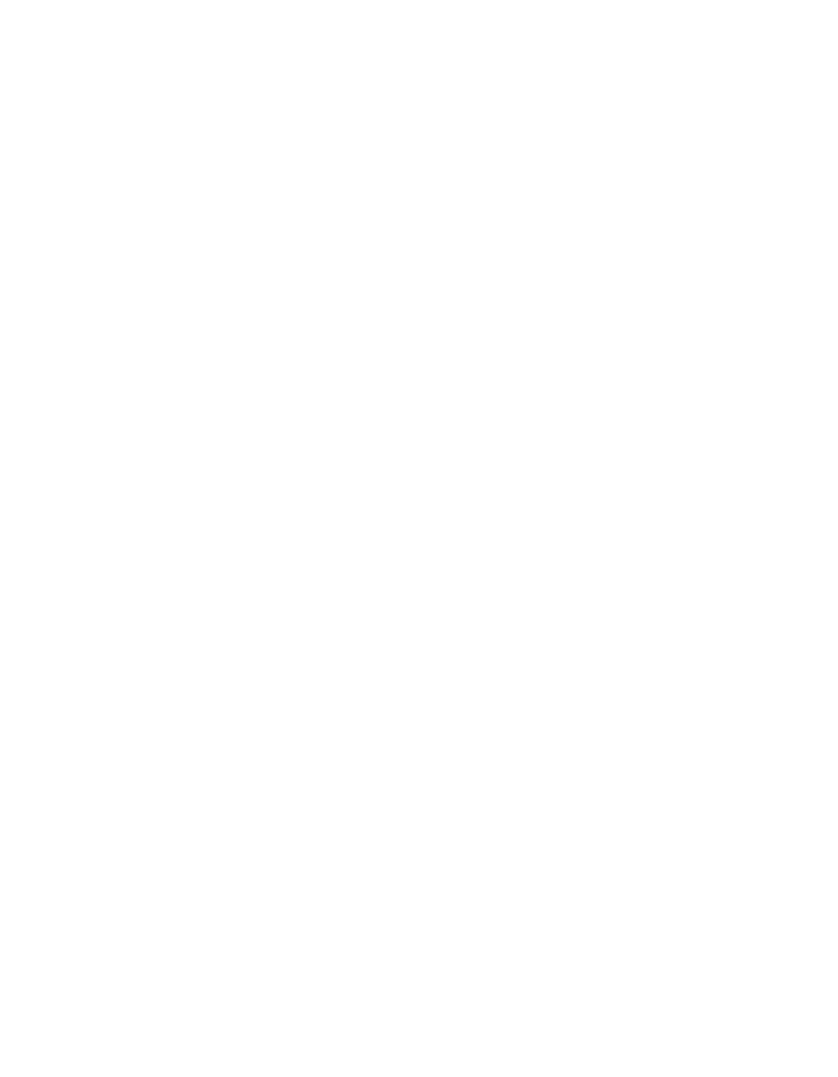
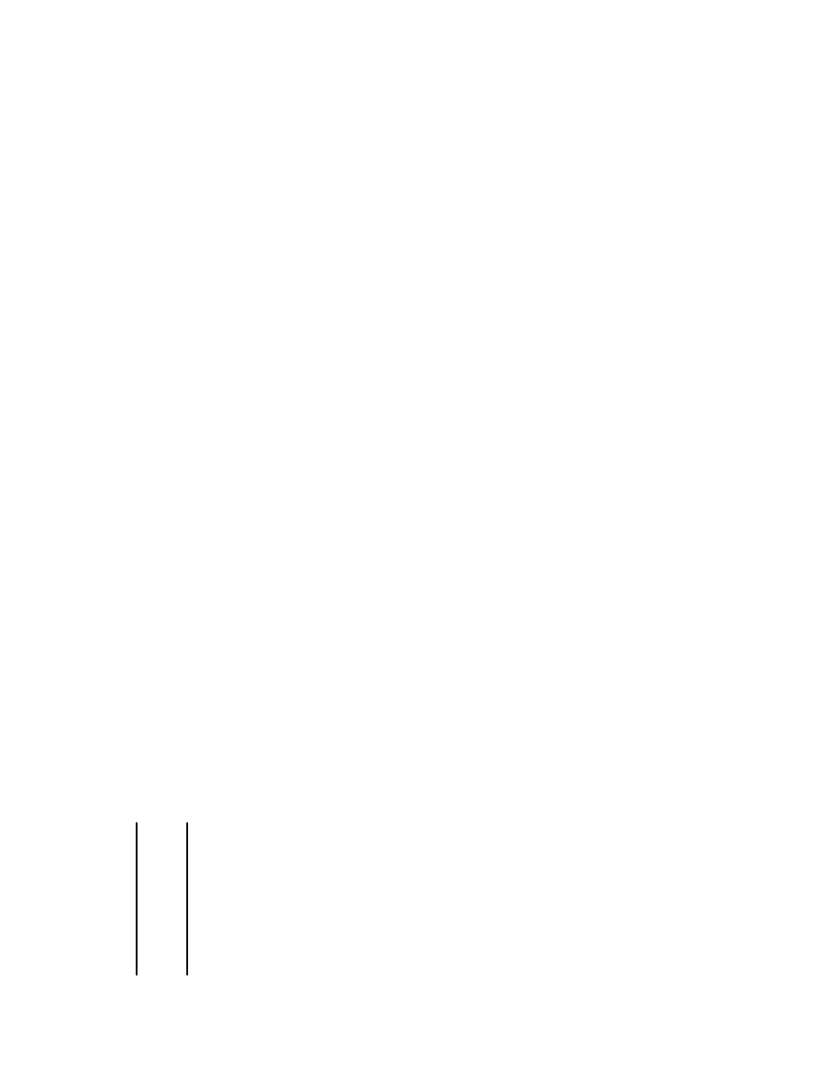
wire: none -> (136, 823) (136, 974)
wire: none -> (187, 823) (187, 974)

